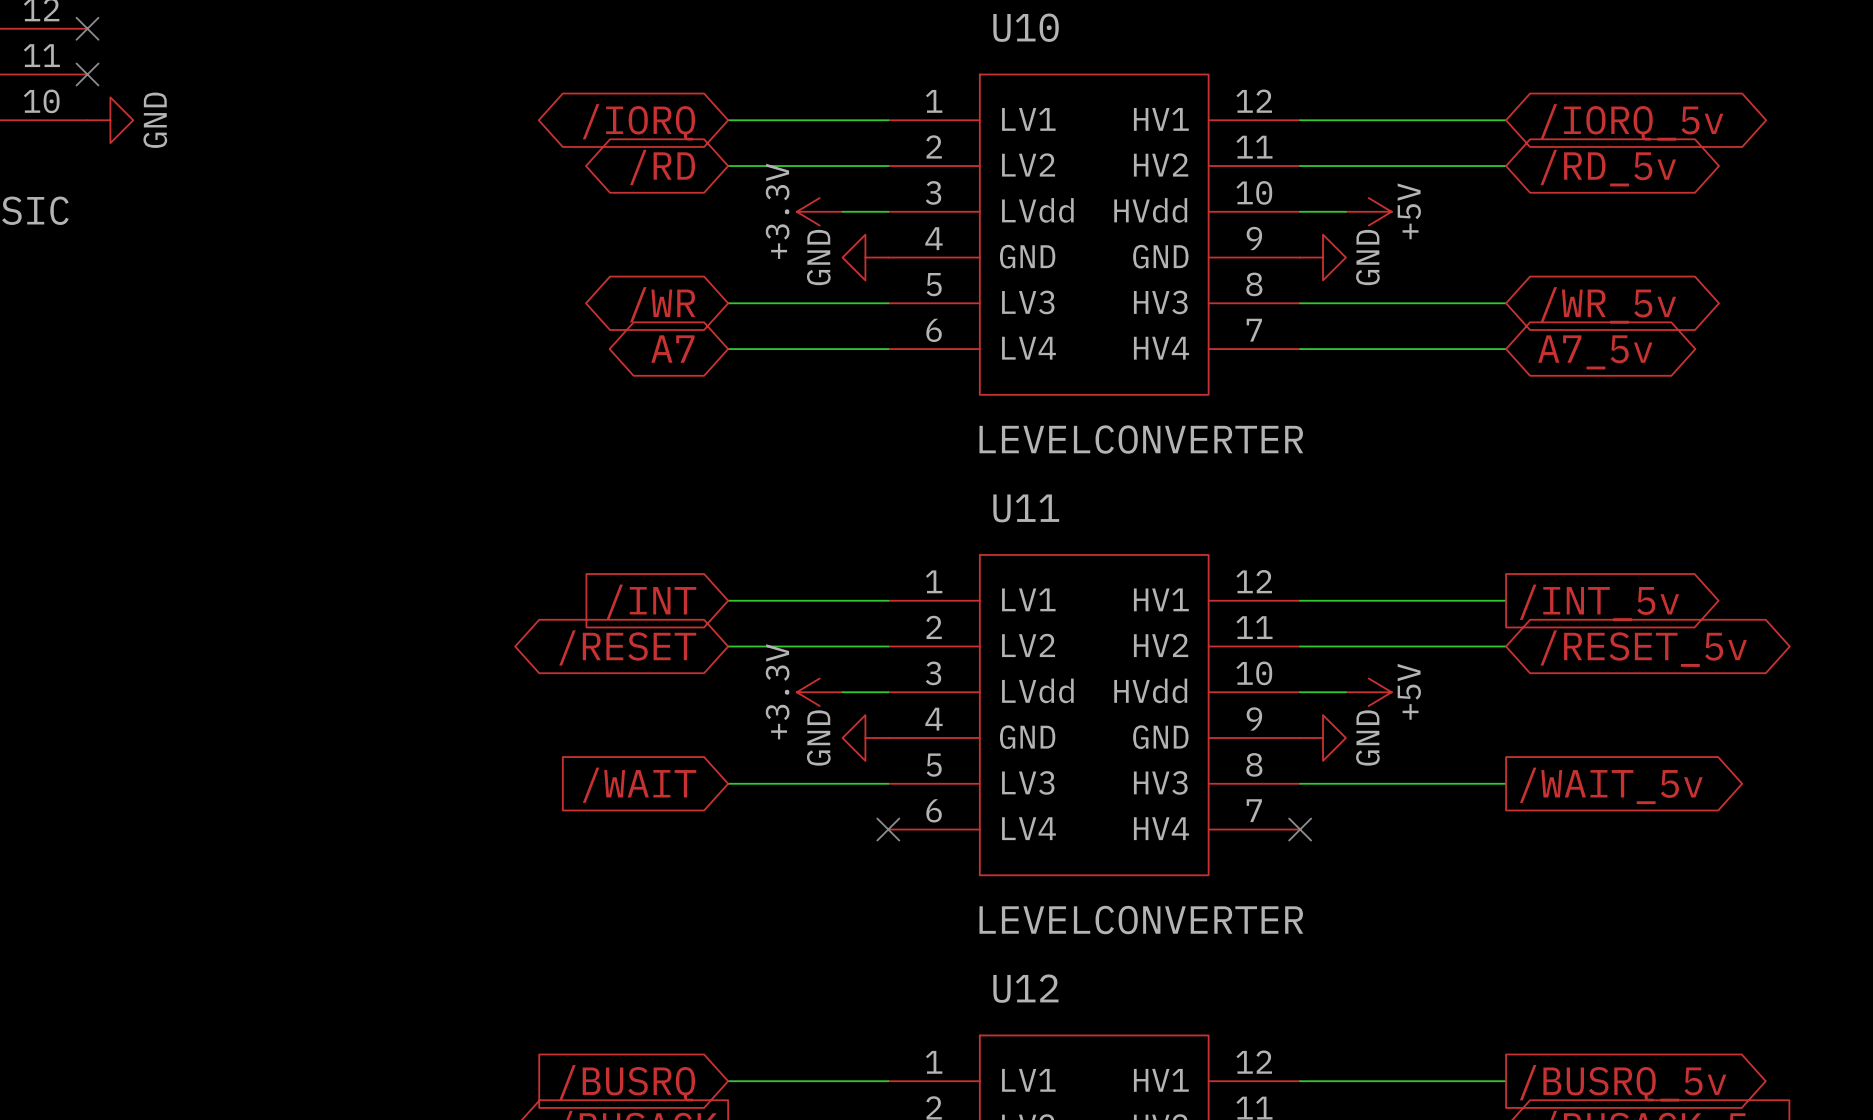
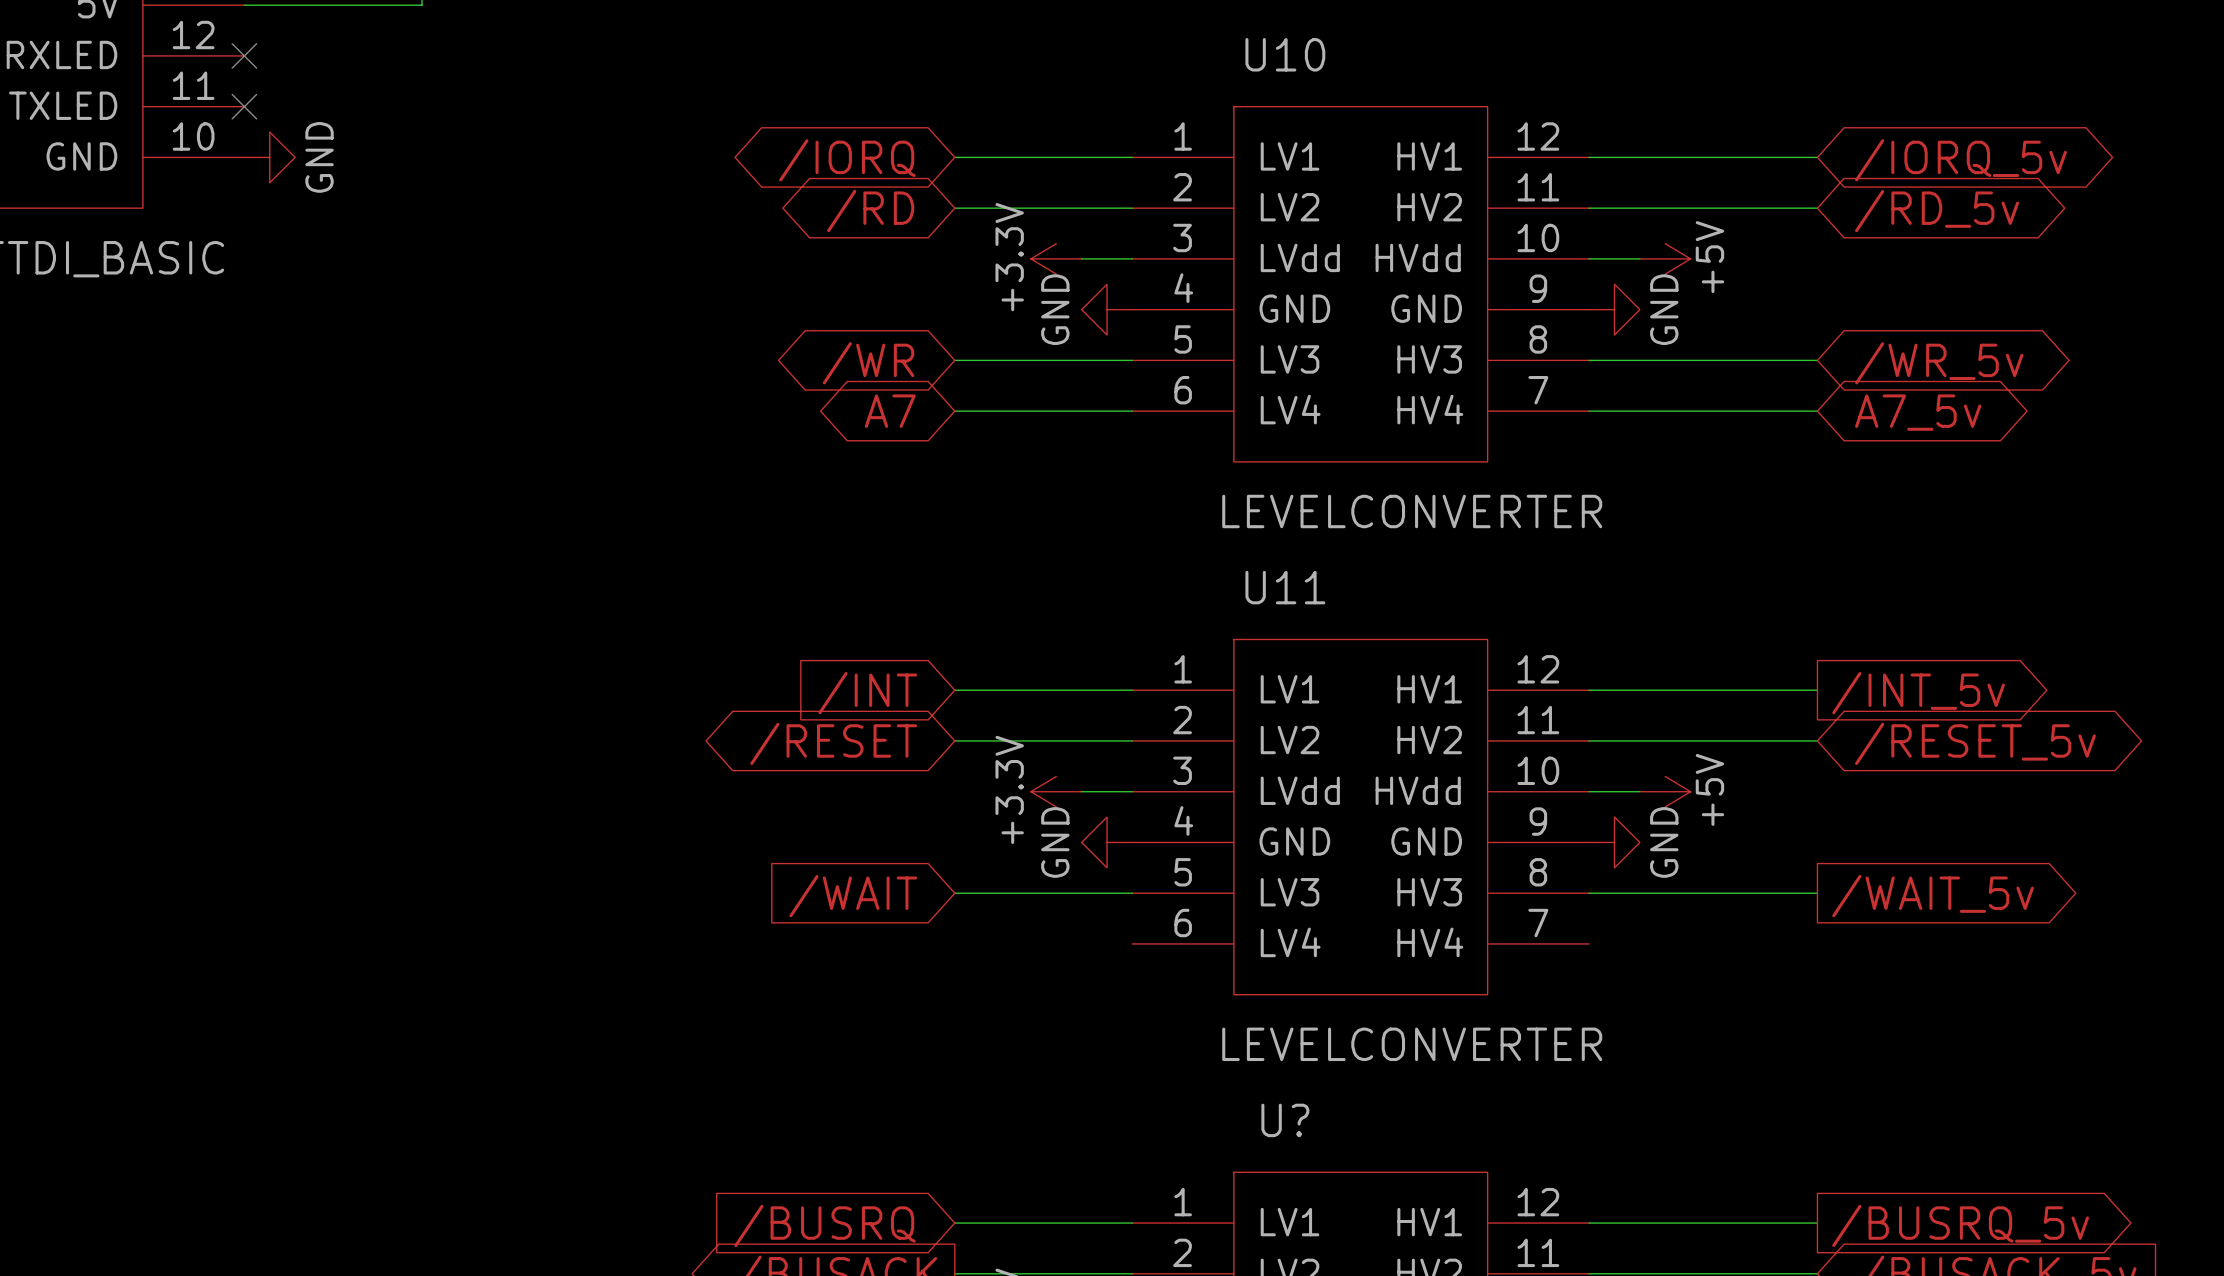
no-connect mark: (888, 829) -> none
no-connect mark: (1300, 829) -> none
U12 name: U12 (1025, 988) -> U? (1285, 1120)

